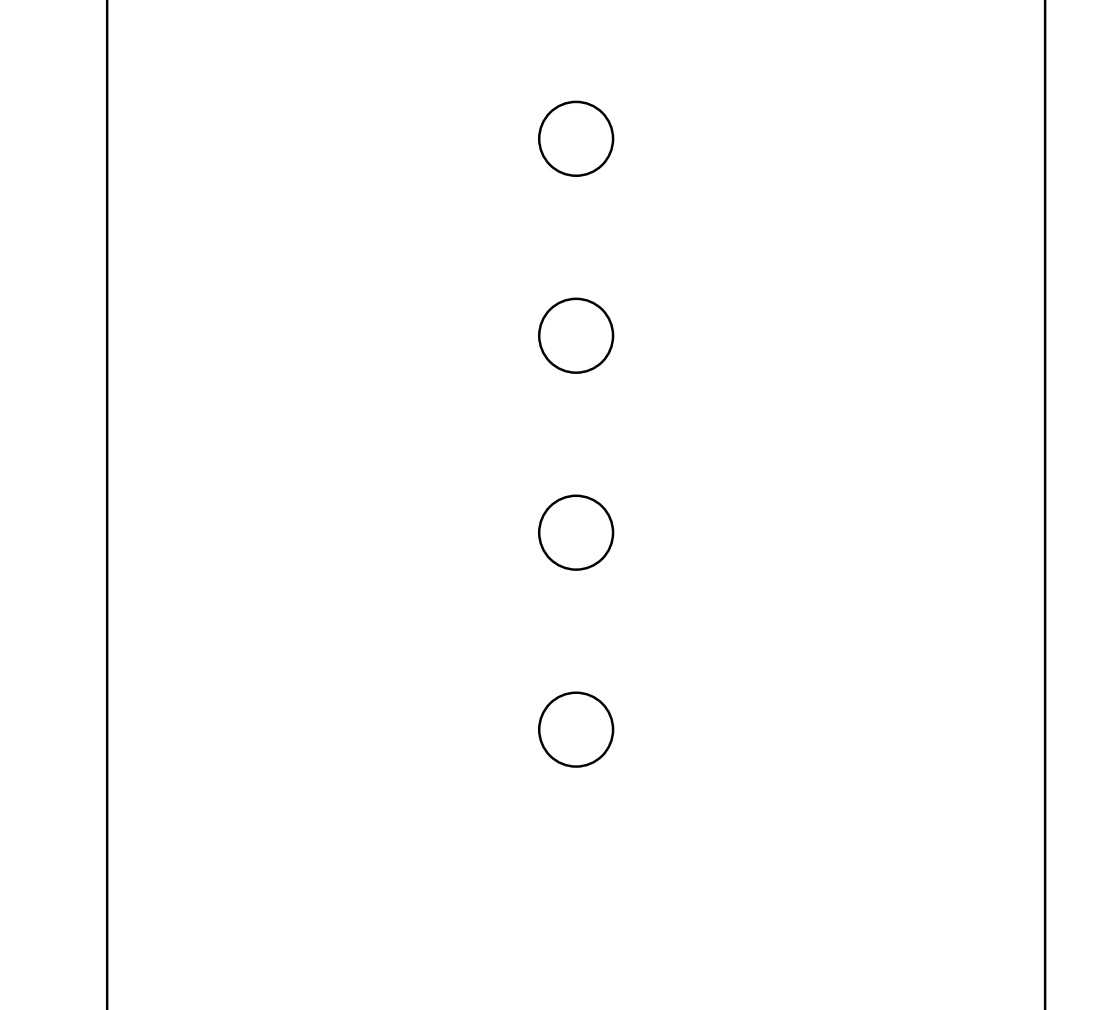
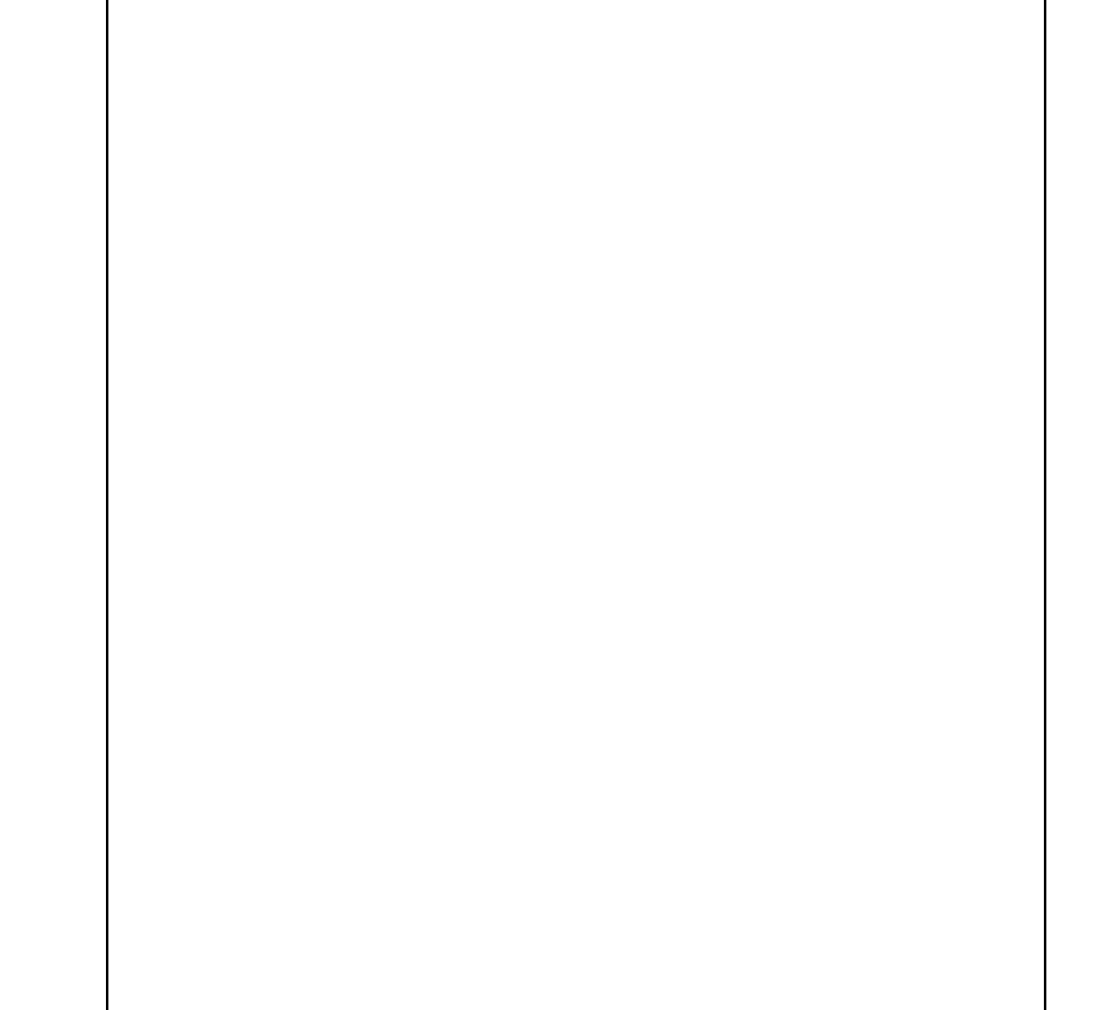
round board edge: [537, 100, 615, 177] -> none
round board edge: [537, 297, 615, 374] -> none
round board edge: [537, 494, 615, 571] -> none
round board edge: [537, 691, 615, 768] -> none

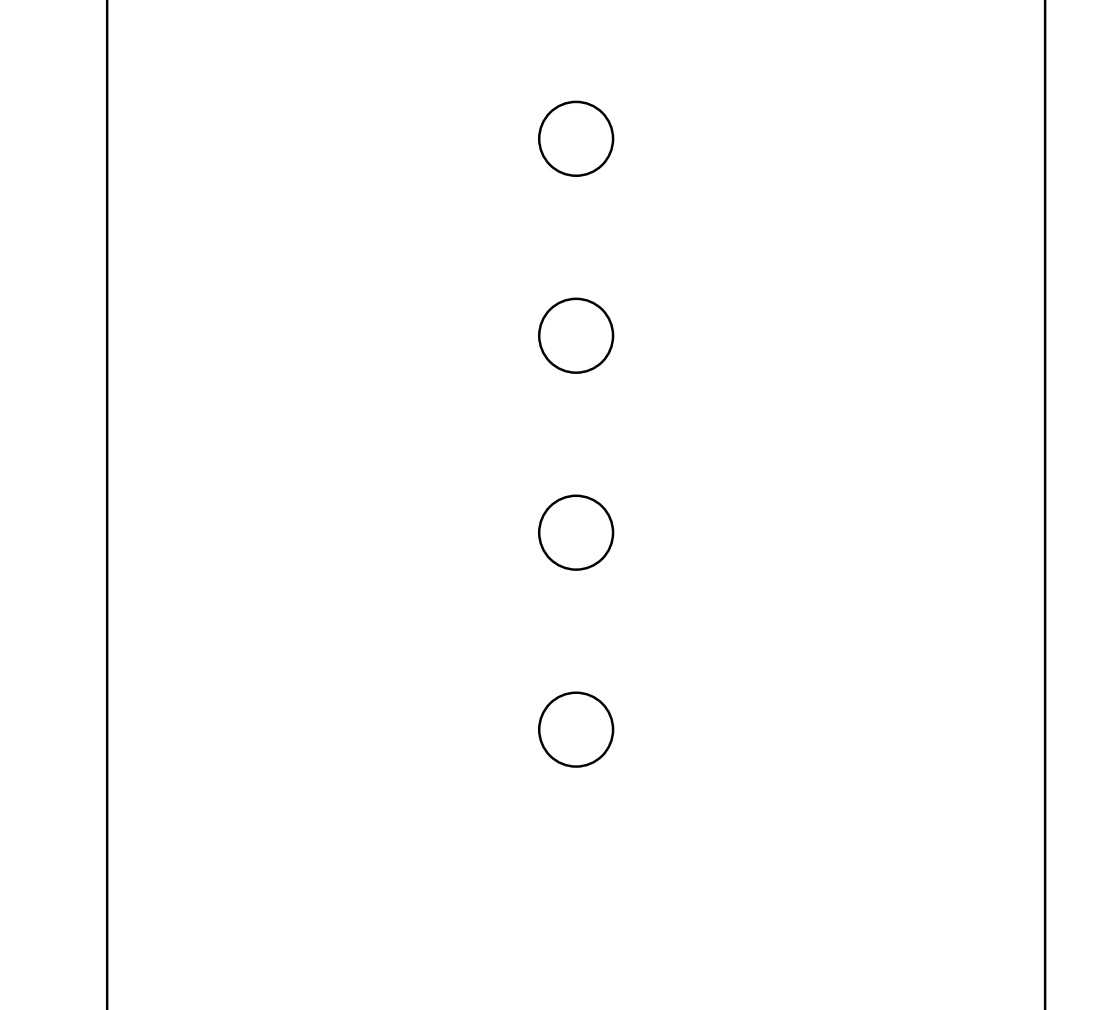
round board edge: none -> [537, 100, 615, 177]
round board edge: none -> [537, 297, 615, 374]
round board edge: none -> [537, 494, 615, 571]
round board edge: none -> [537, 691, 615, 768]

